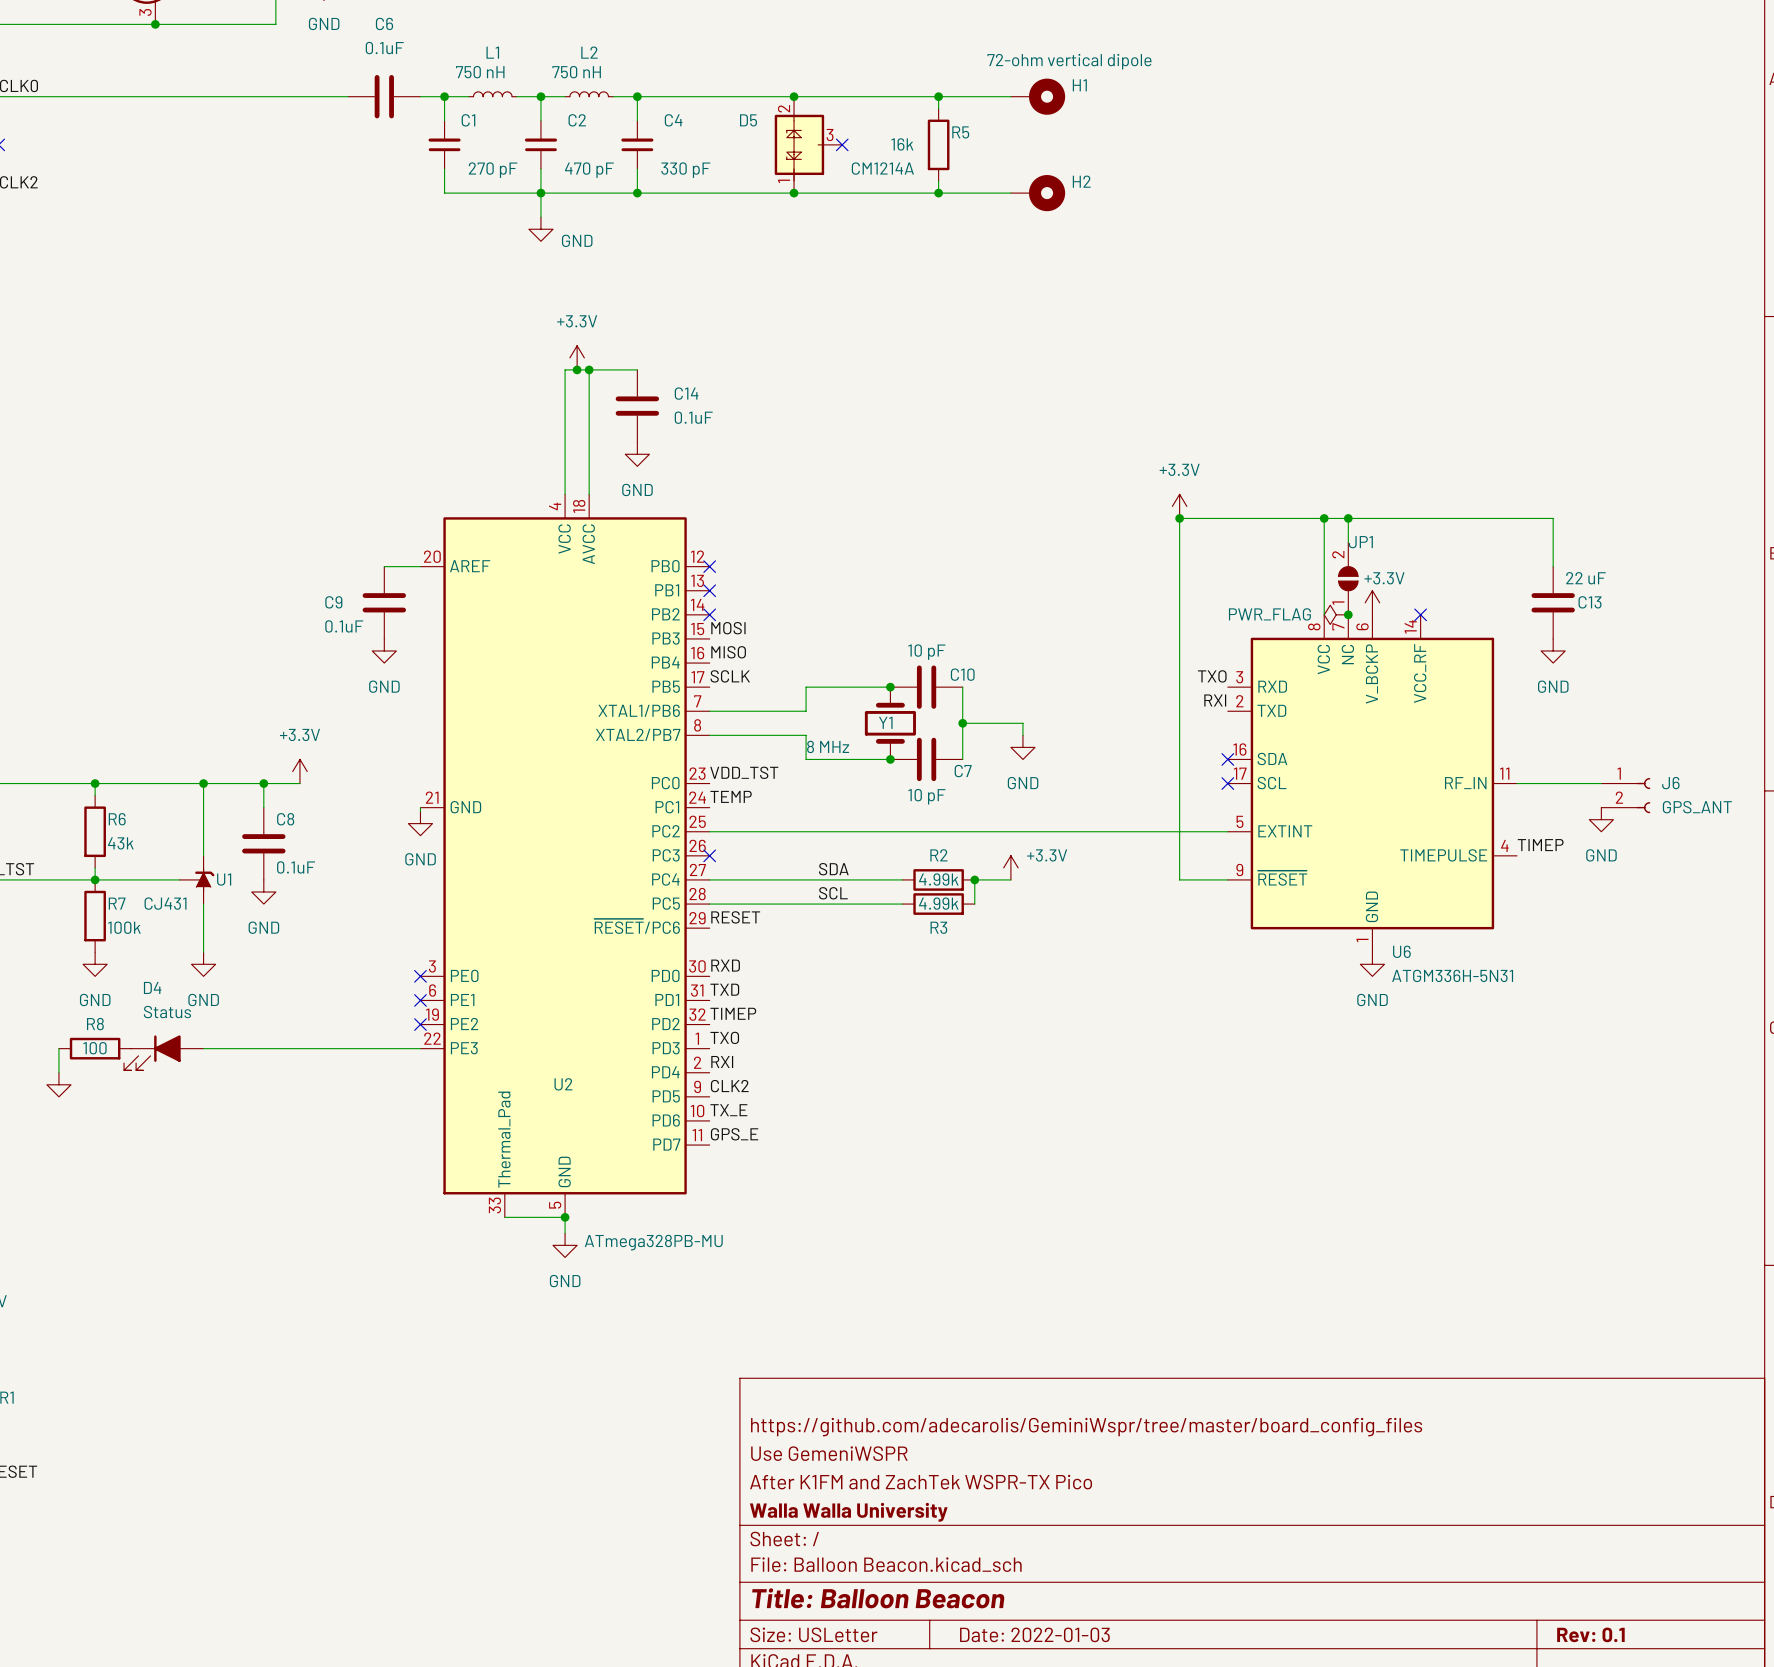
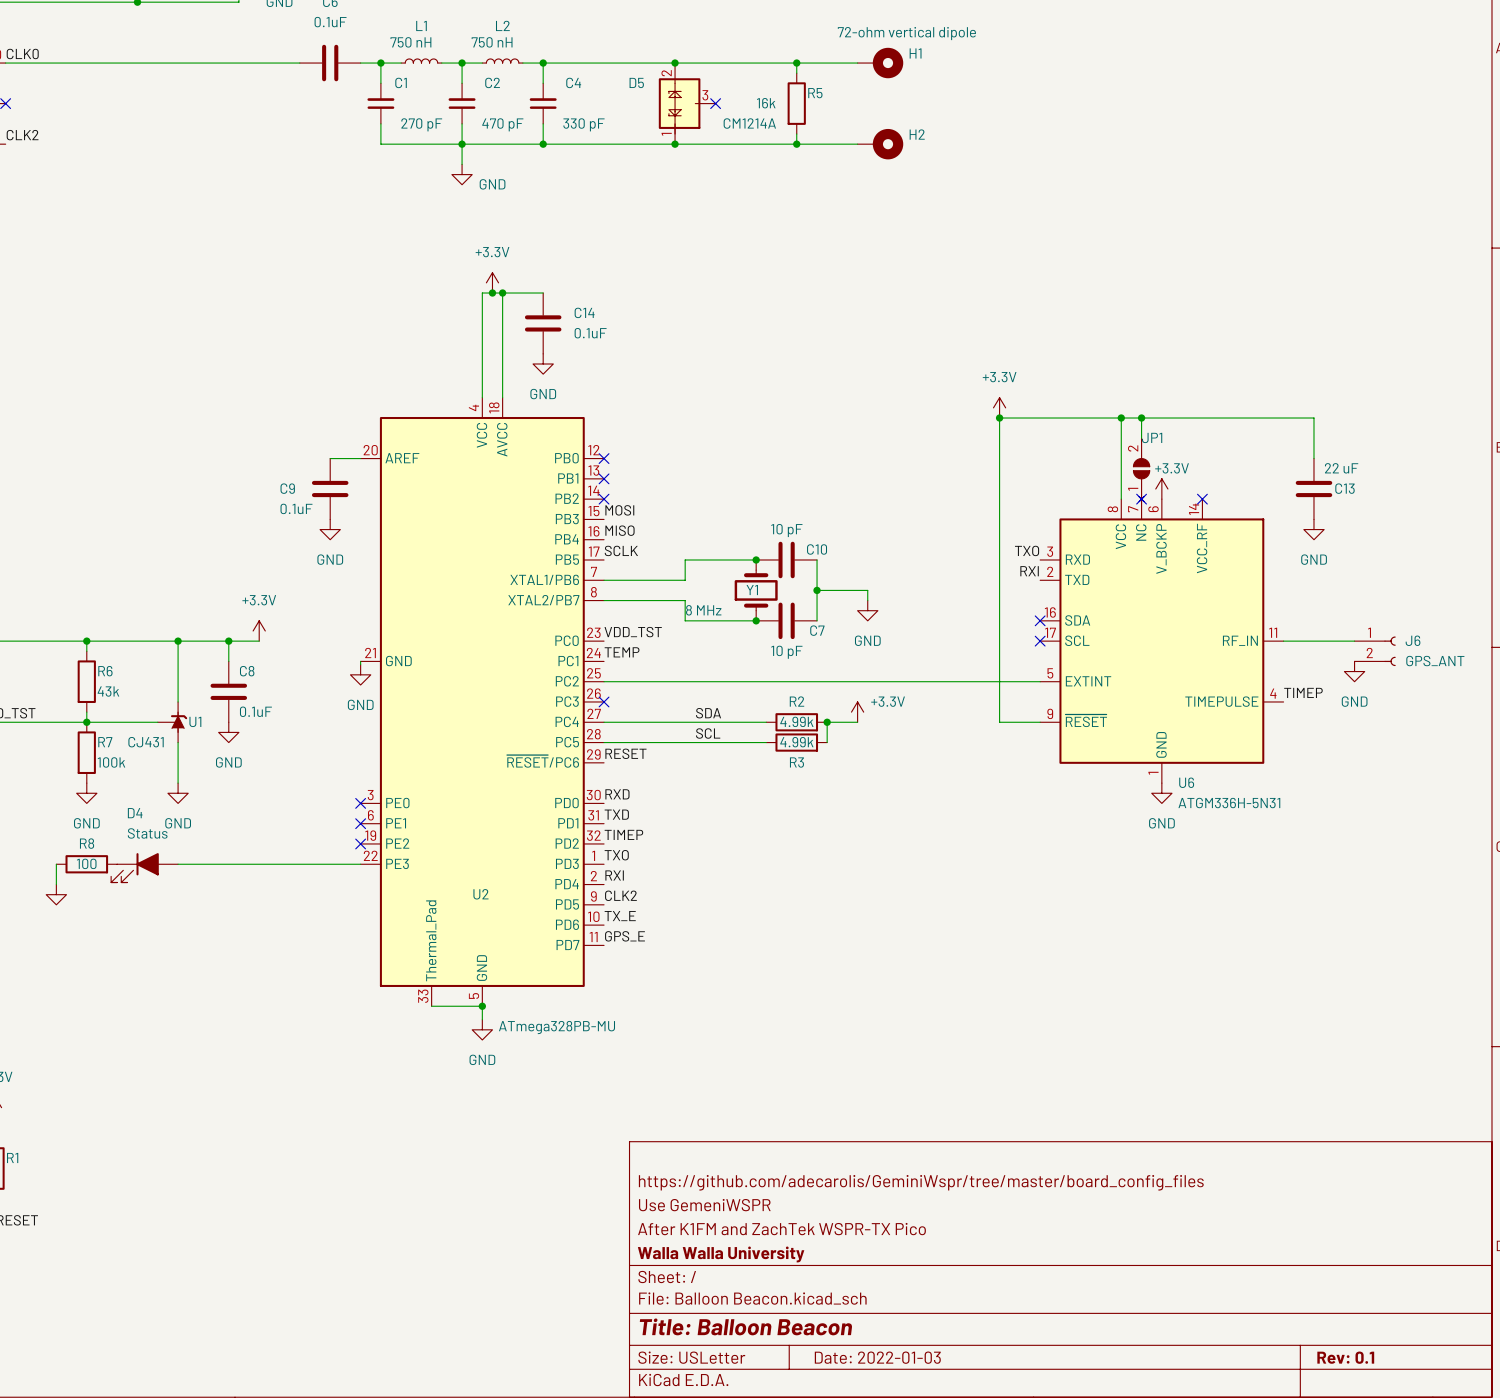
U6 symbol: [1227, 614, 1518, 953] -> [1040, 496, 1284, 784]
power symbol: PWR_FLAG (1336, 614) -> none
junction: (1348, 614) -> none
no-connect mark: none -> (1141, 499)

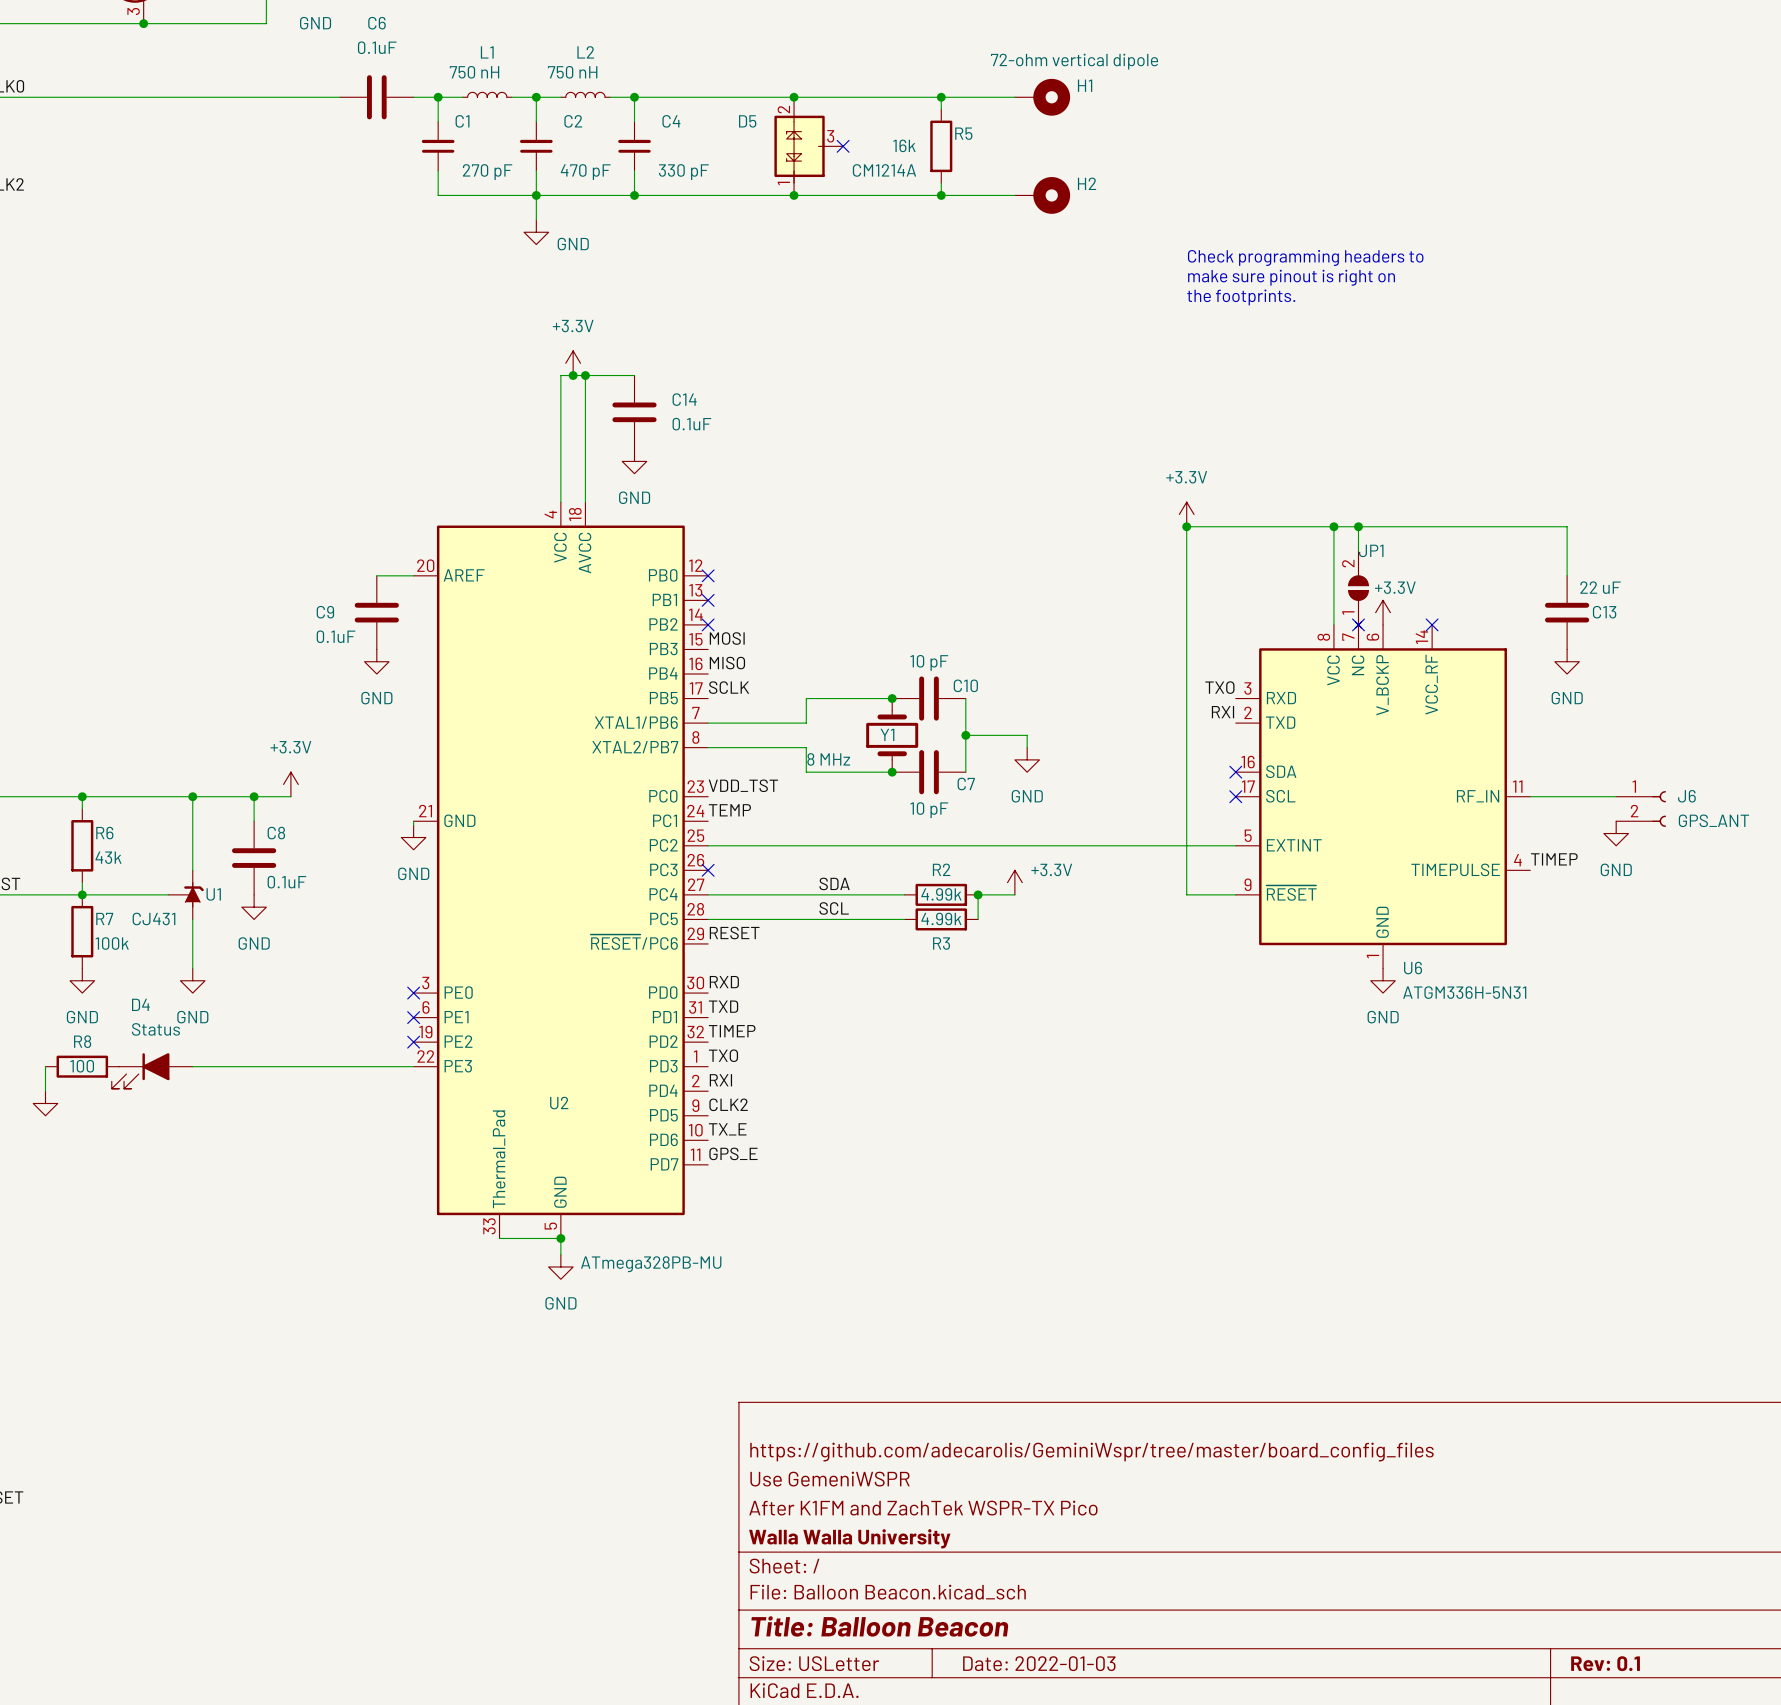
text: none -> Check programming headers to (1305, 257)
text: none -> make sure pinout is right on (1291, 277)
text: none -> the footprints. (1241, 297)

